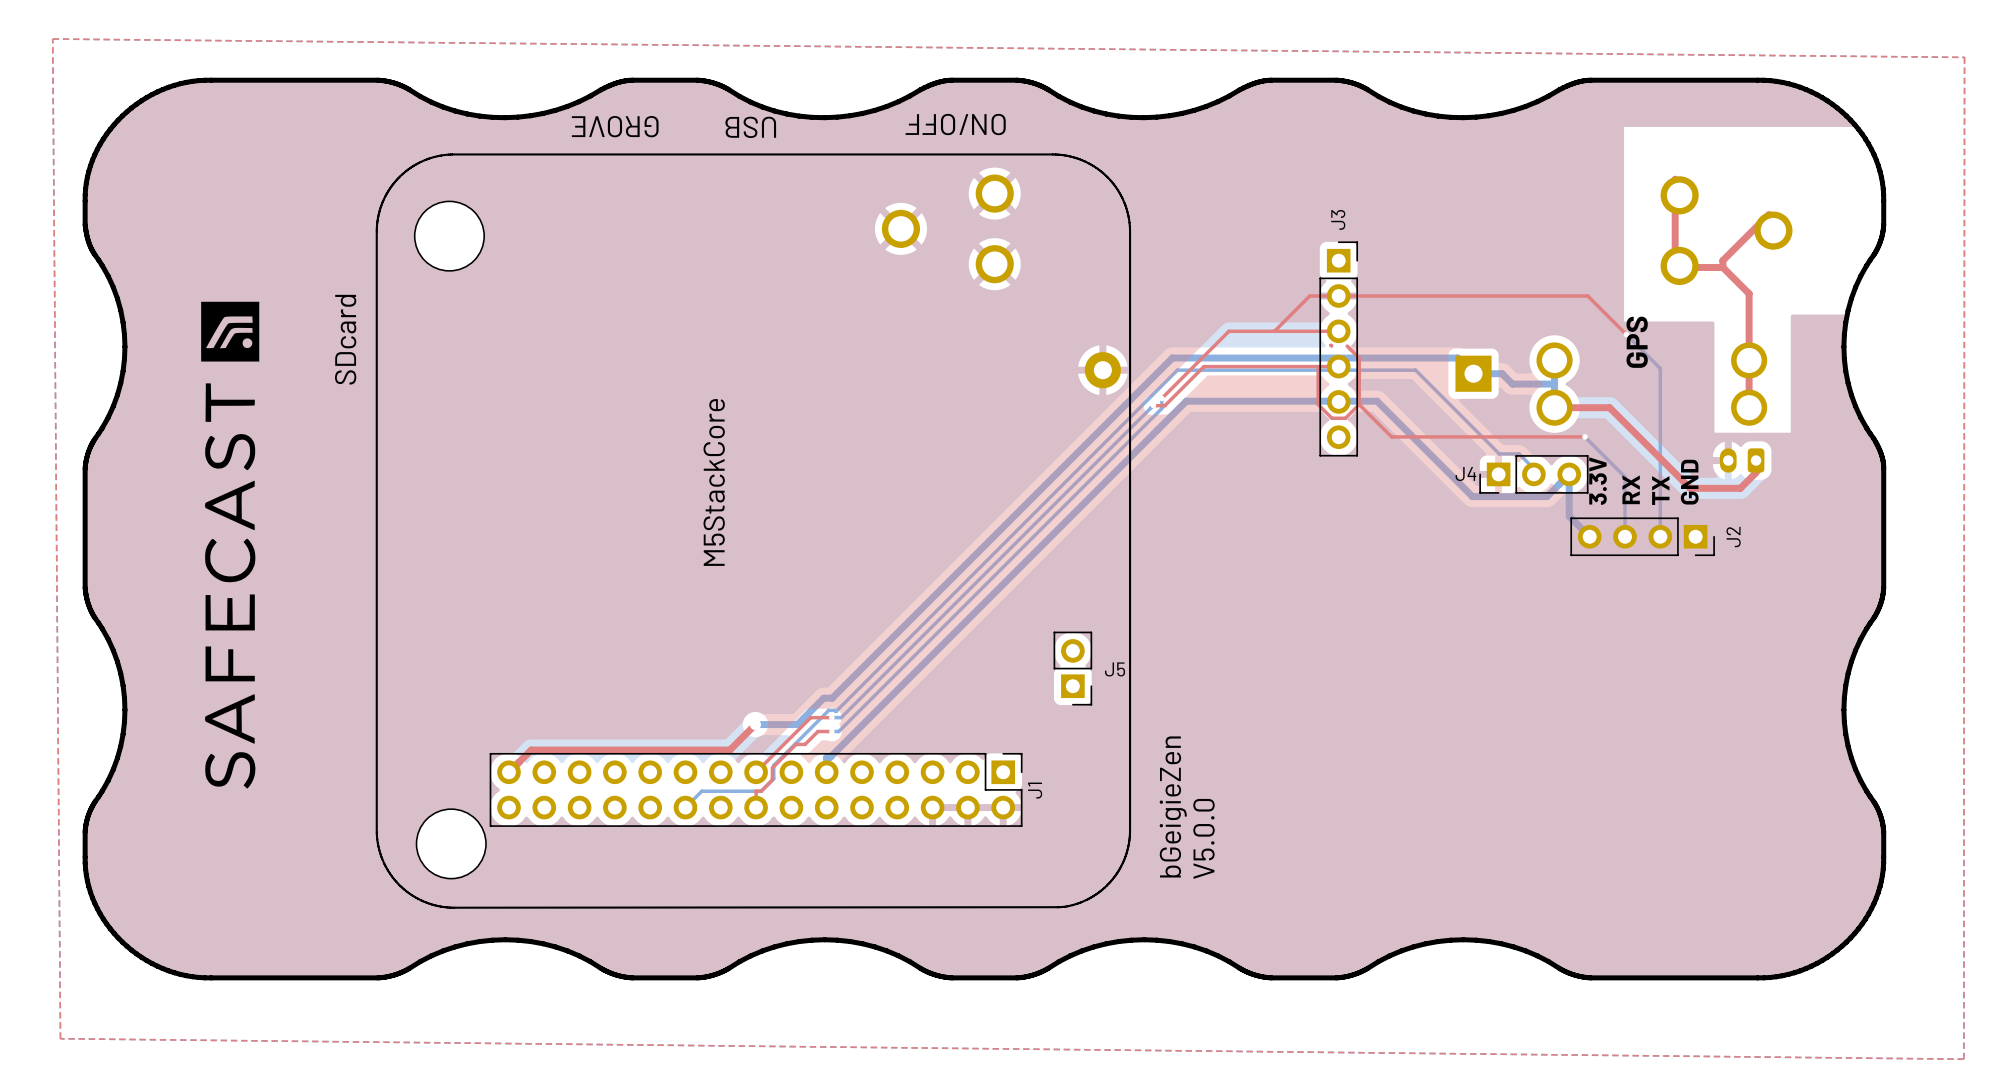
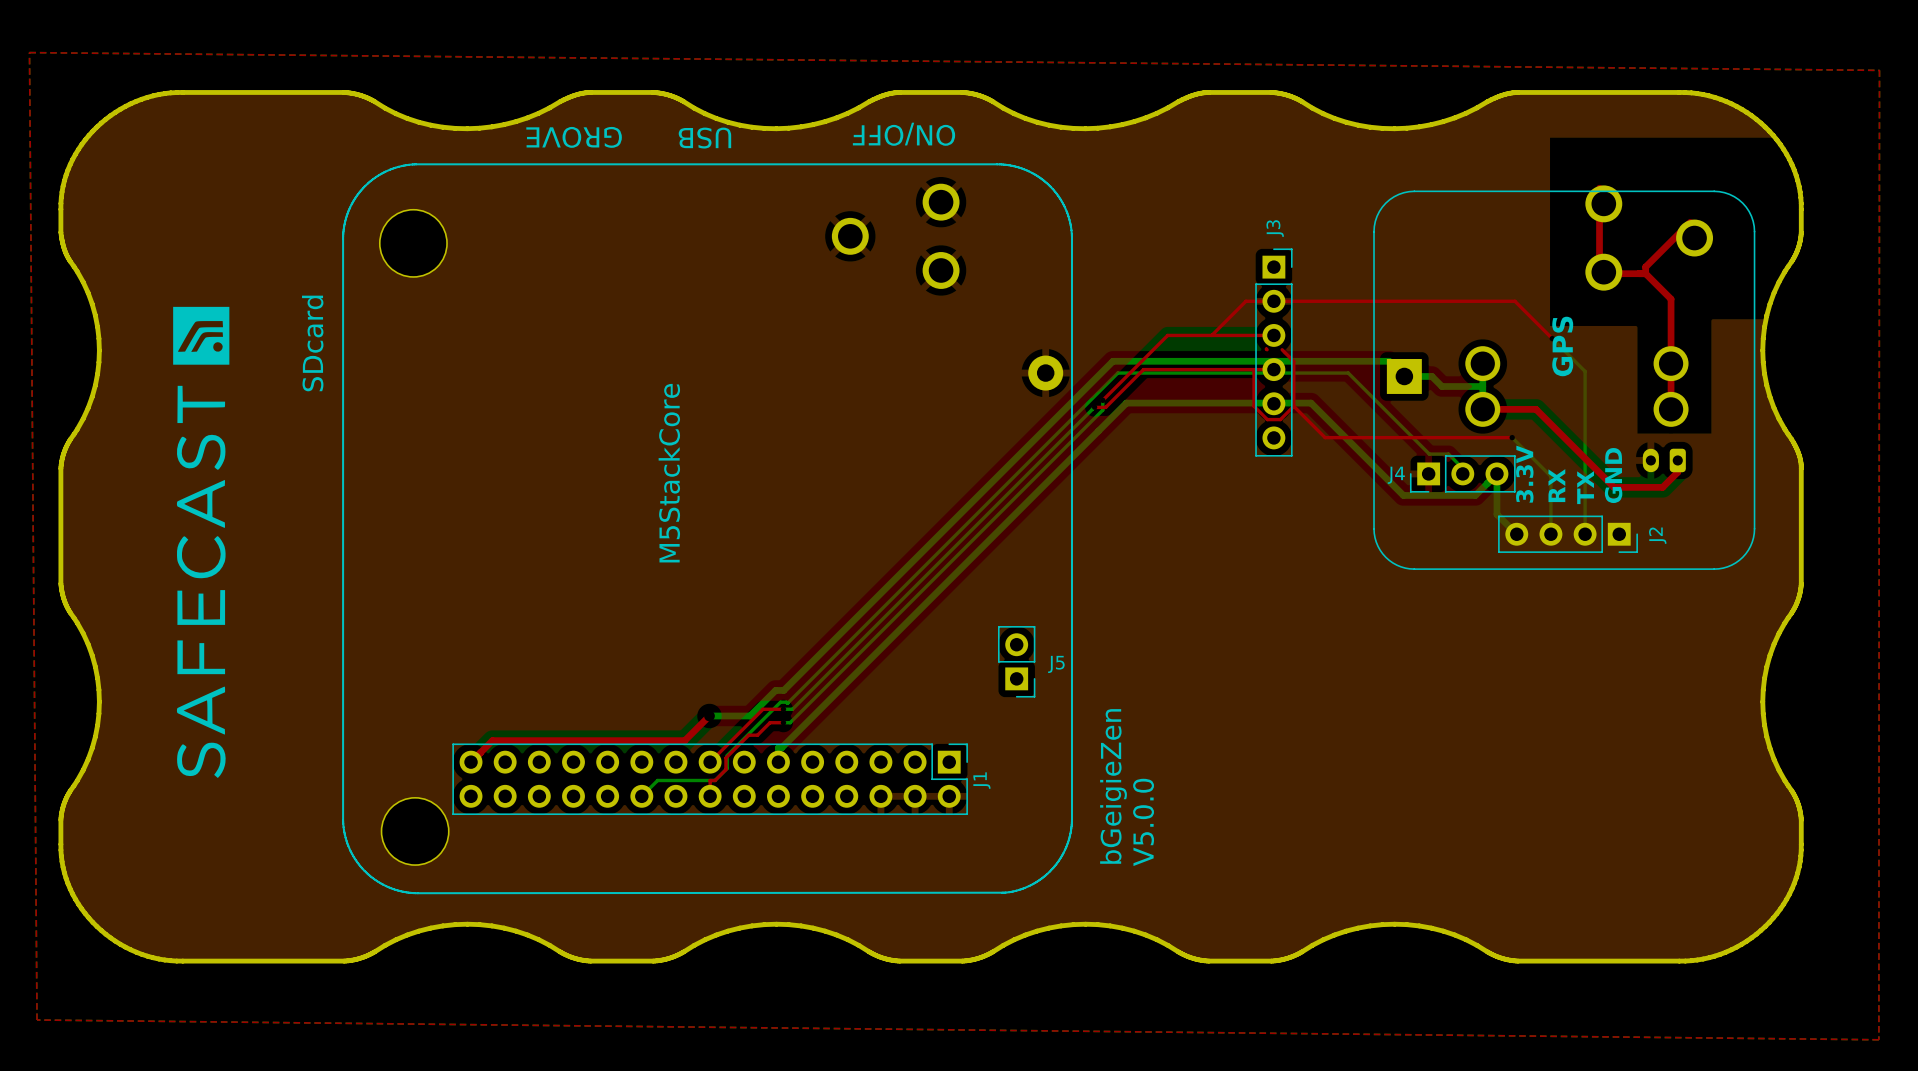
line: none -> (1414, 191) (1714, 191) (1729, 194) (1742, 203) (1751, 216) (1754, 231) (1754, 528) (1750, 546) (1739, 560) (1727, 566) (1714, 569) (1414, 569) (1396, 565) (1382, 553) (1376, 542) (1374, 528) (1374, 226) (1379, 211) (1389, 199) (1403, 192) (1414, 191)

